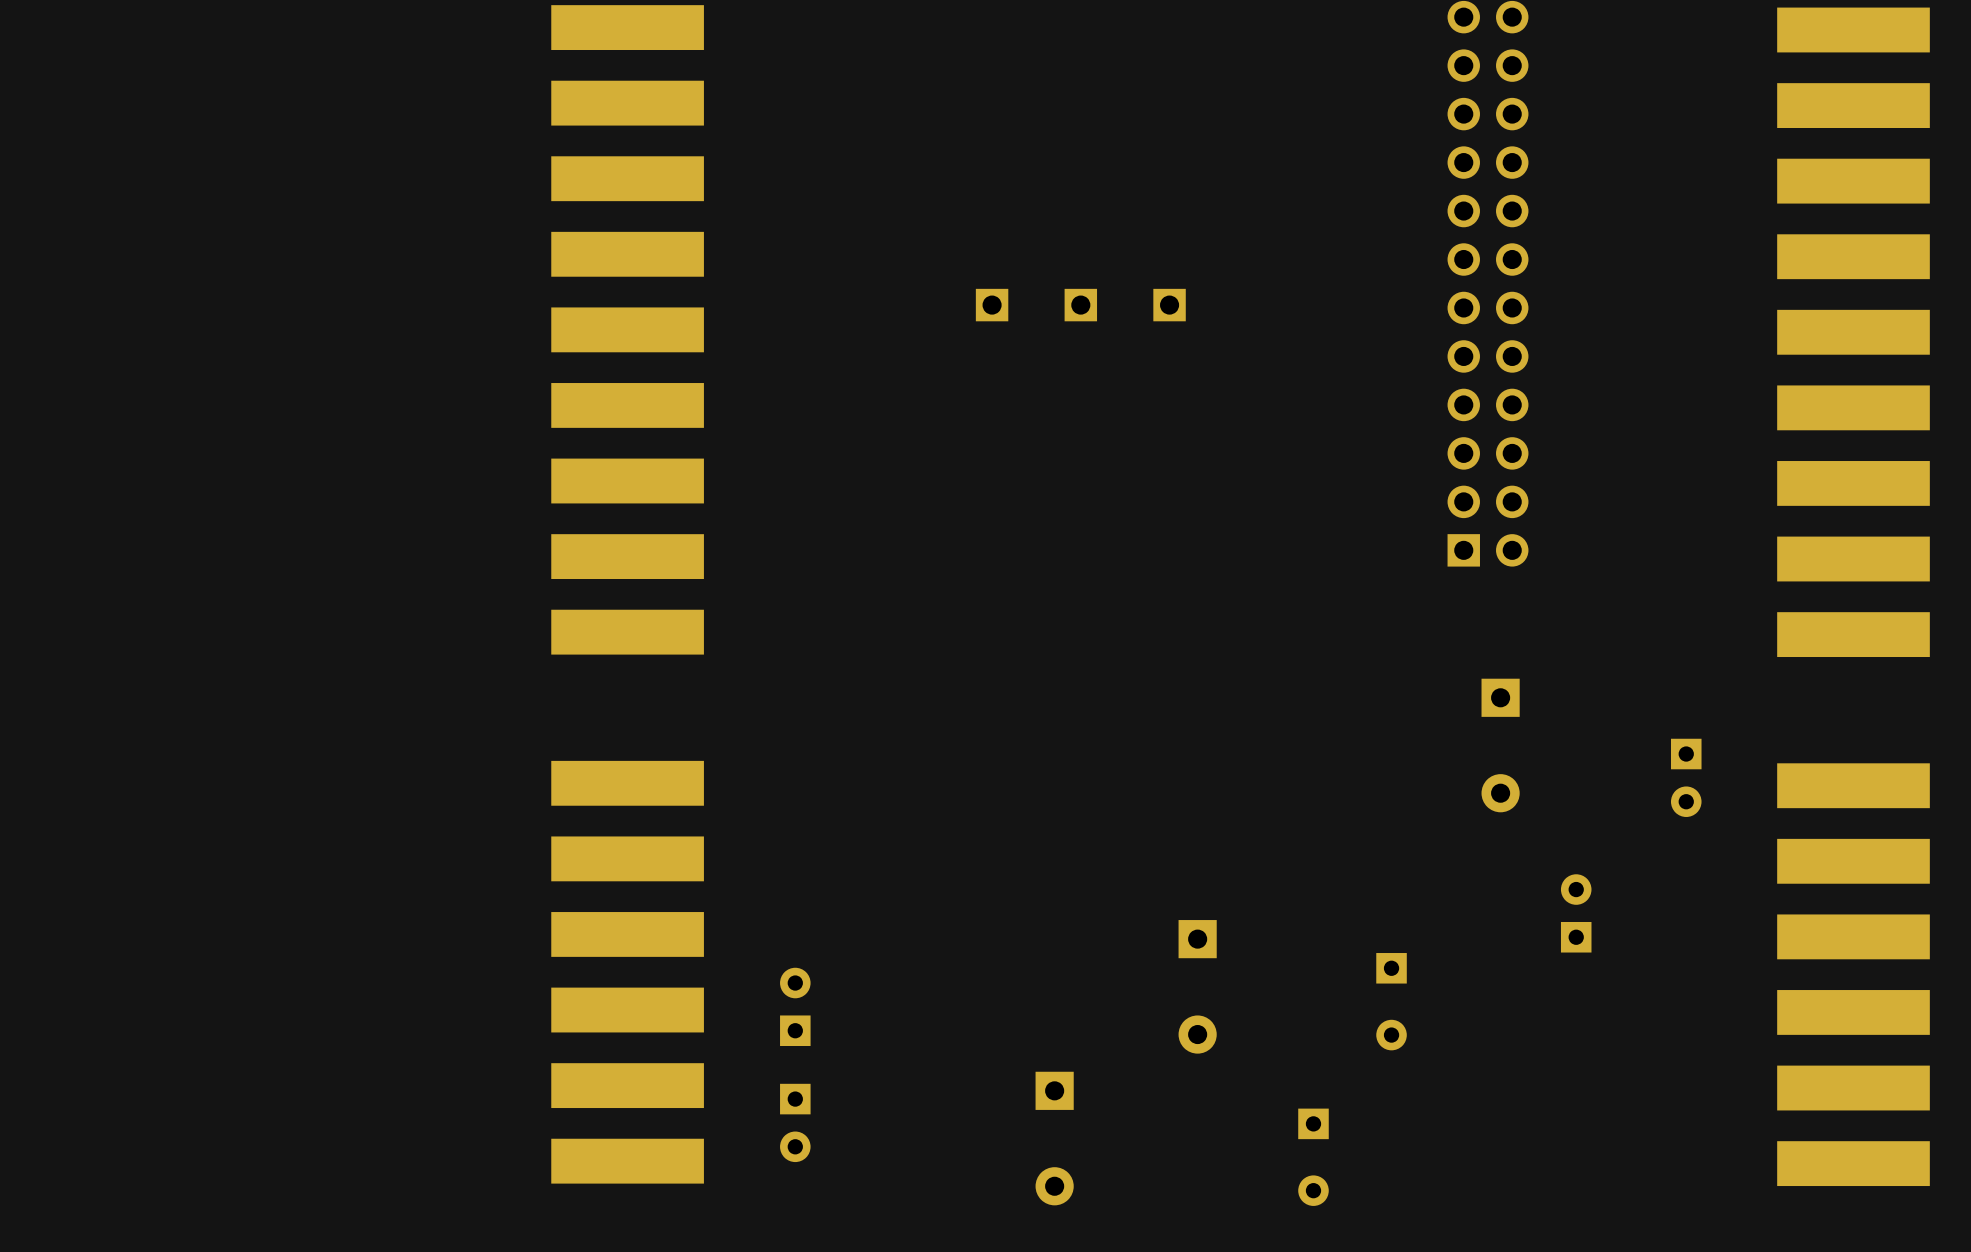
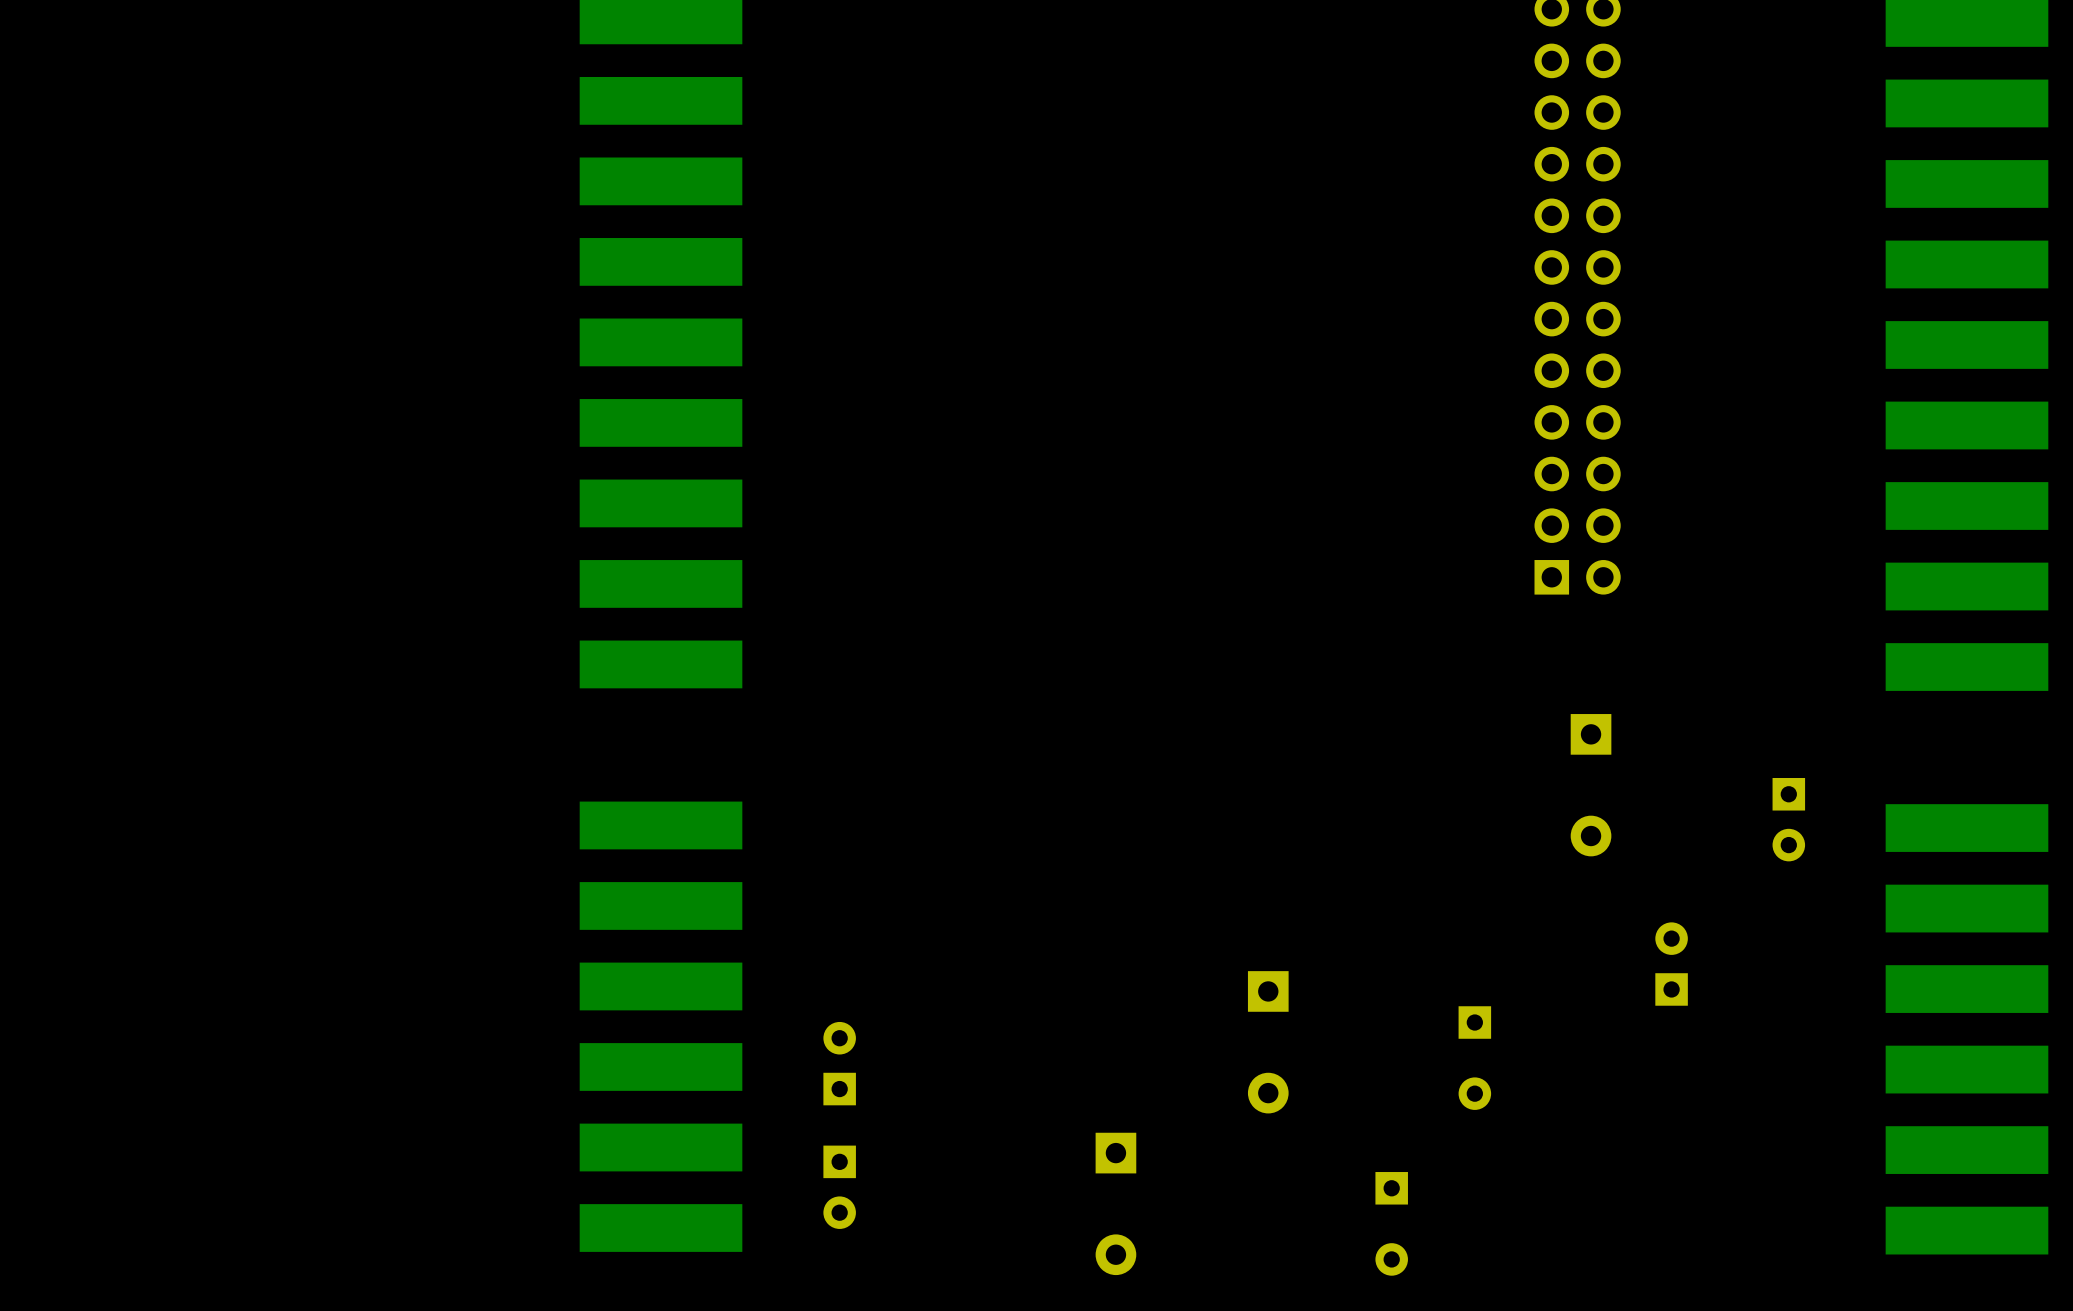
part: (992, 305) -> none
part: (1080, 305) -> none
part: (1169, 305) -> none

